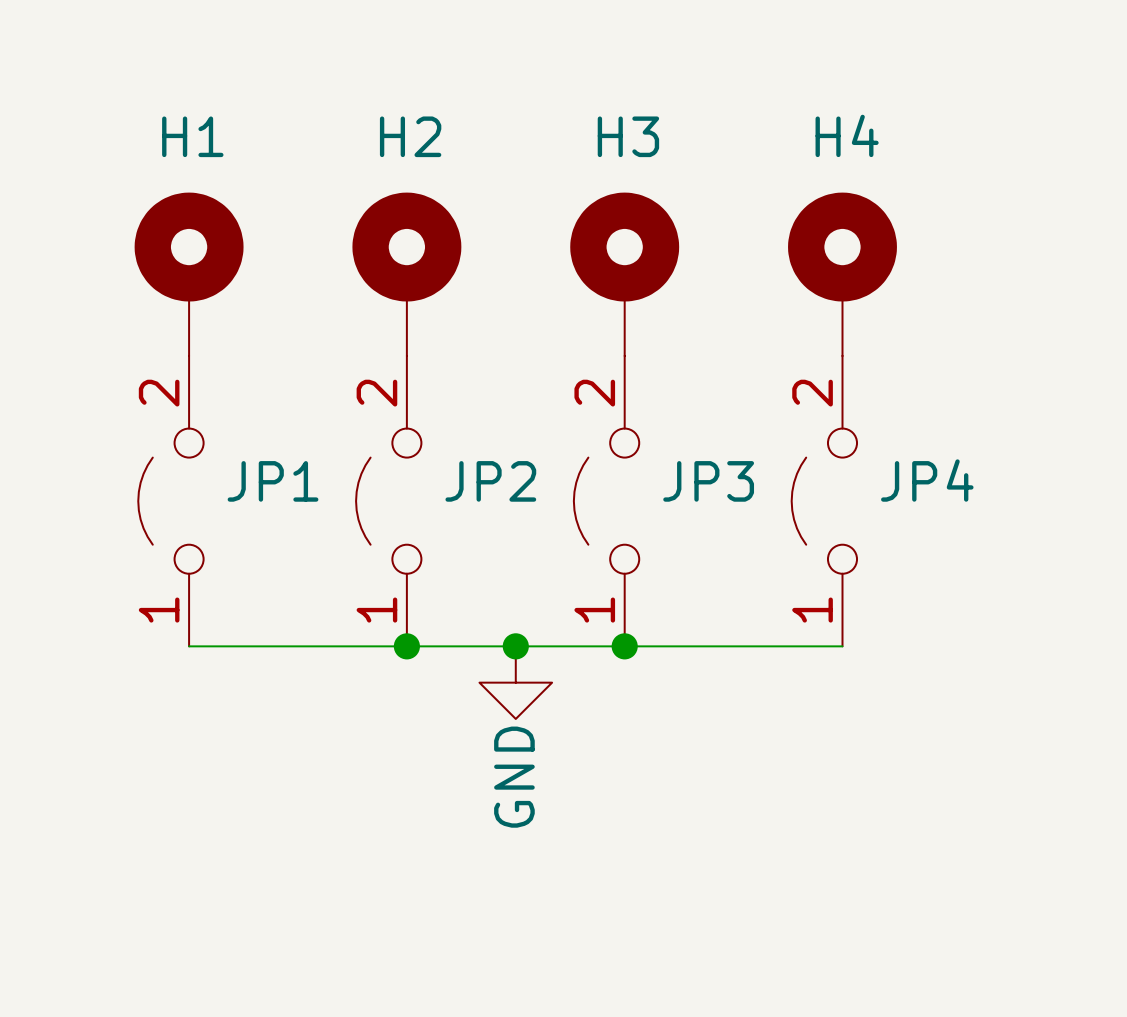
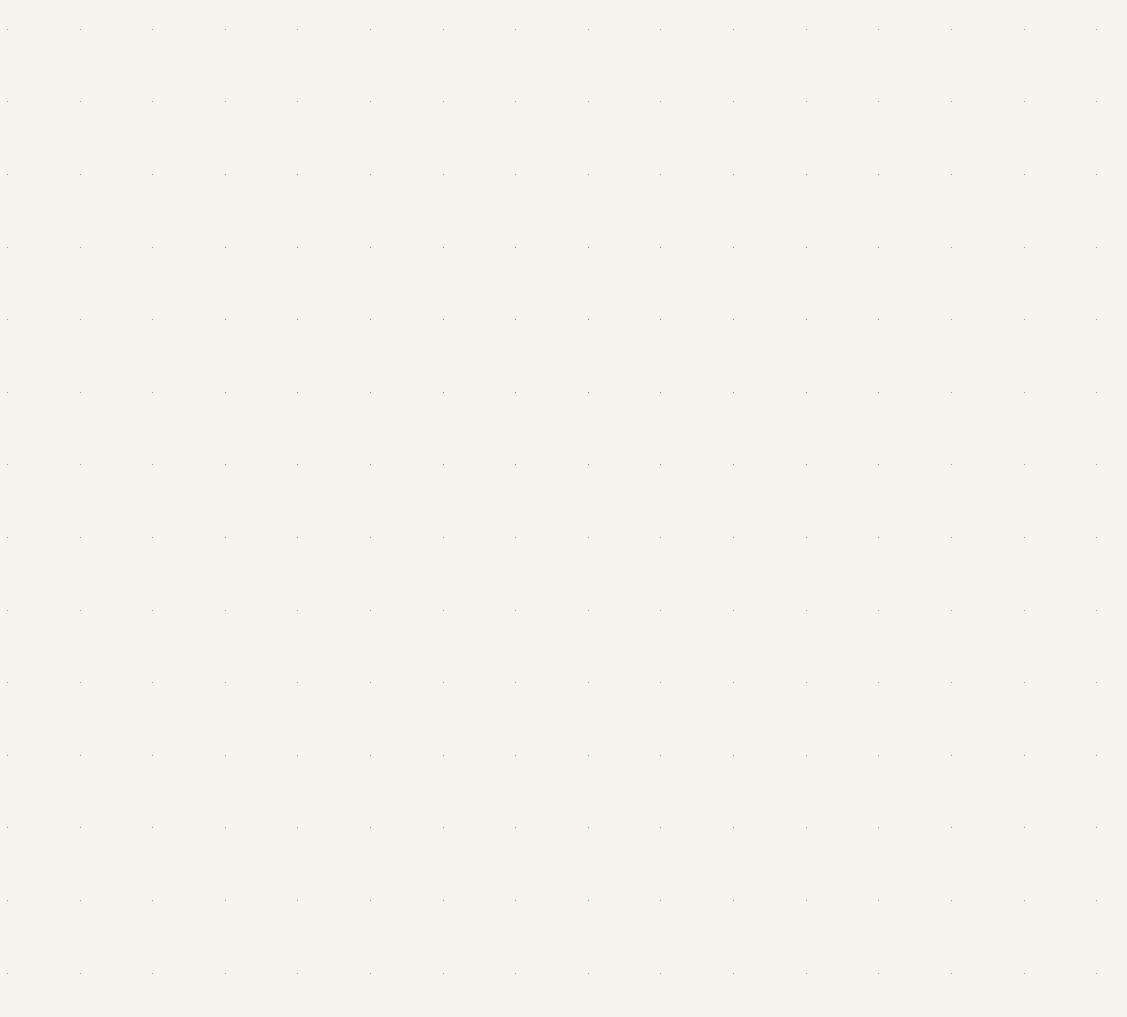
H1: (189, 274) -> none
H2: (406, 274) -> none
H3: (624, 274) -> none
H4: (842, 274) -> none
JP1: (170, 501) -> none
JP2: (388, 501) -> none
JP3: (606, 501) -> none
JP4: (824, 501) -> none
wire: (189, 646) (842, 646) -> none
junction: (406, 646) -> none
junction: (515, 646) -> none
junction: (624, 646) -> none
power symbol: GND (515, 682) -> none

